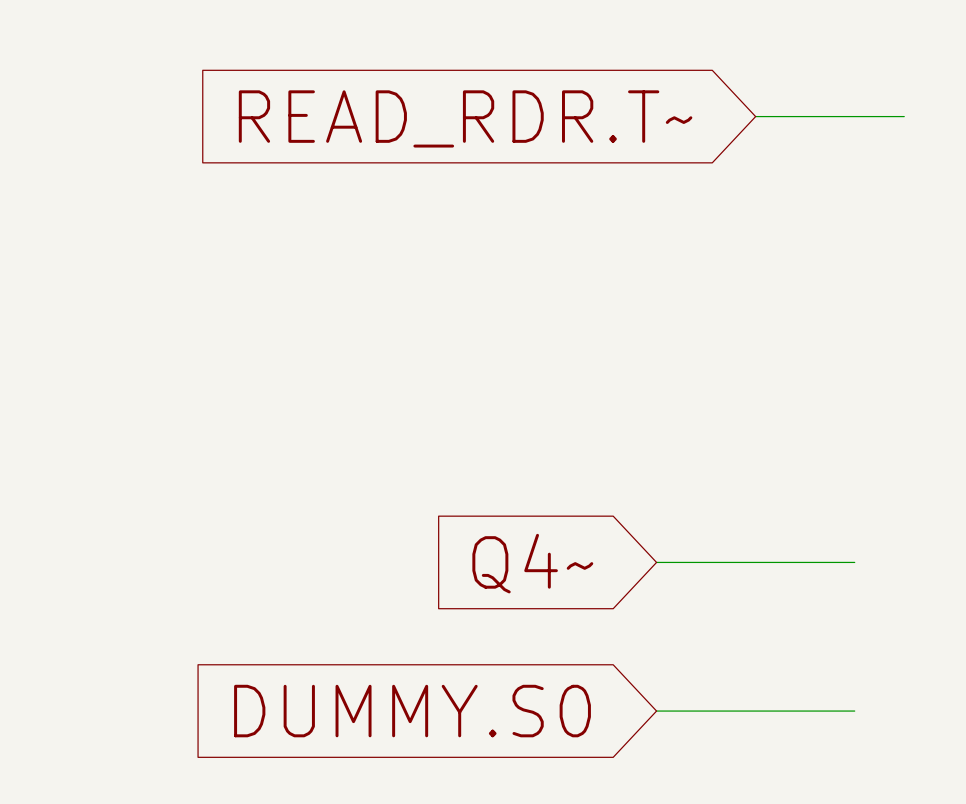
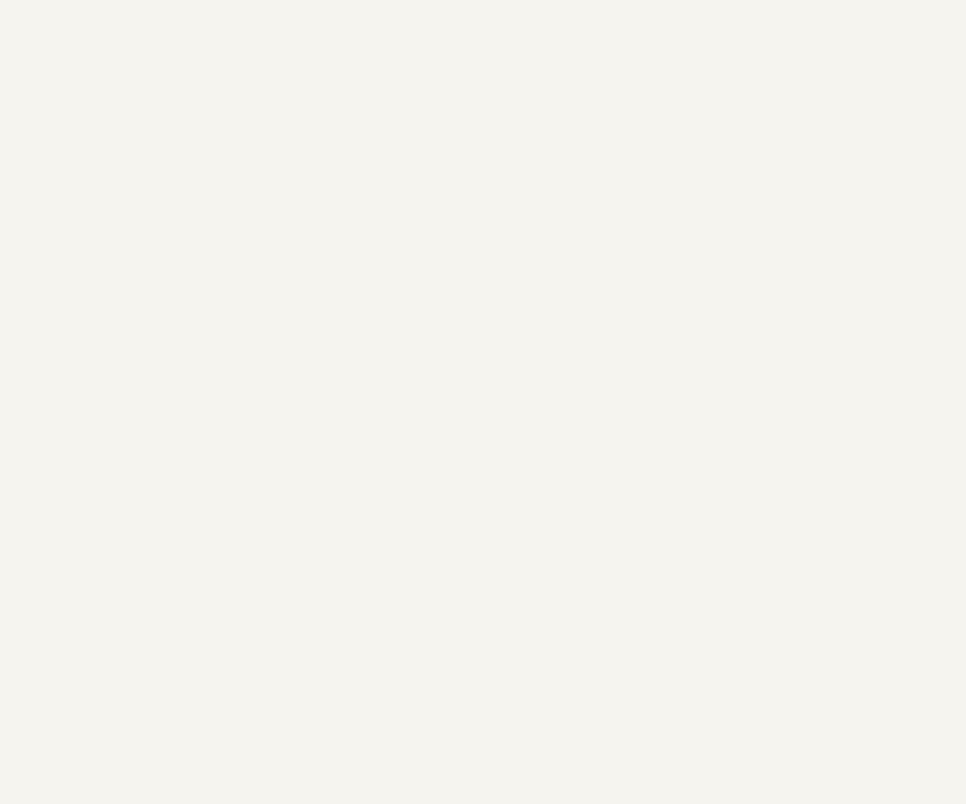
wire: (755, 116) (904, 116) -> none
global label: READ_RDR.T~ (465, 118) -> none
wire: (656, 562) (854, 562) -> none
global label: Q4~ (532, 563) -> none
global label: DUMMY.S0 (412, 711) -> none
wire: (656, 711) (854, 711) -> none

